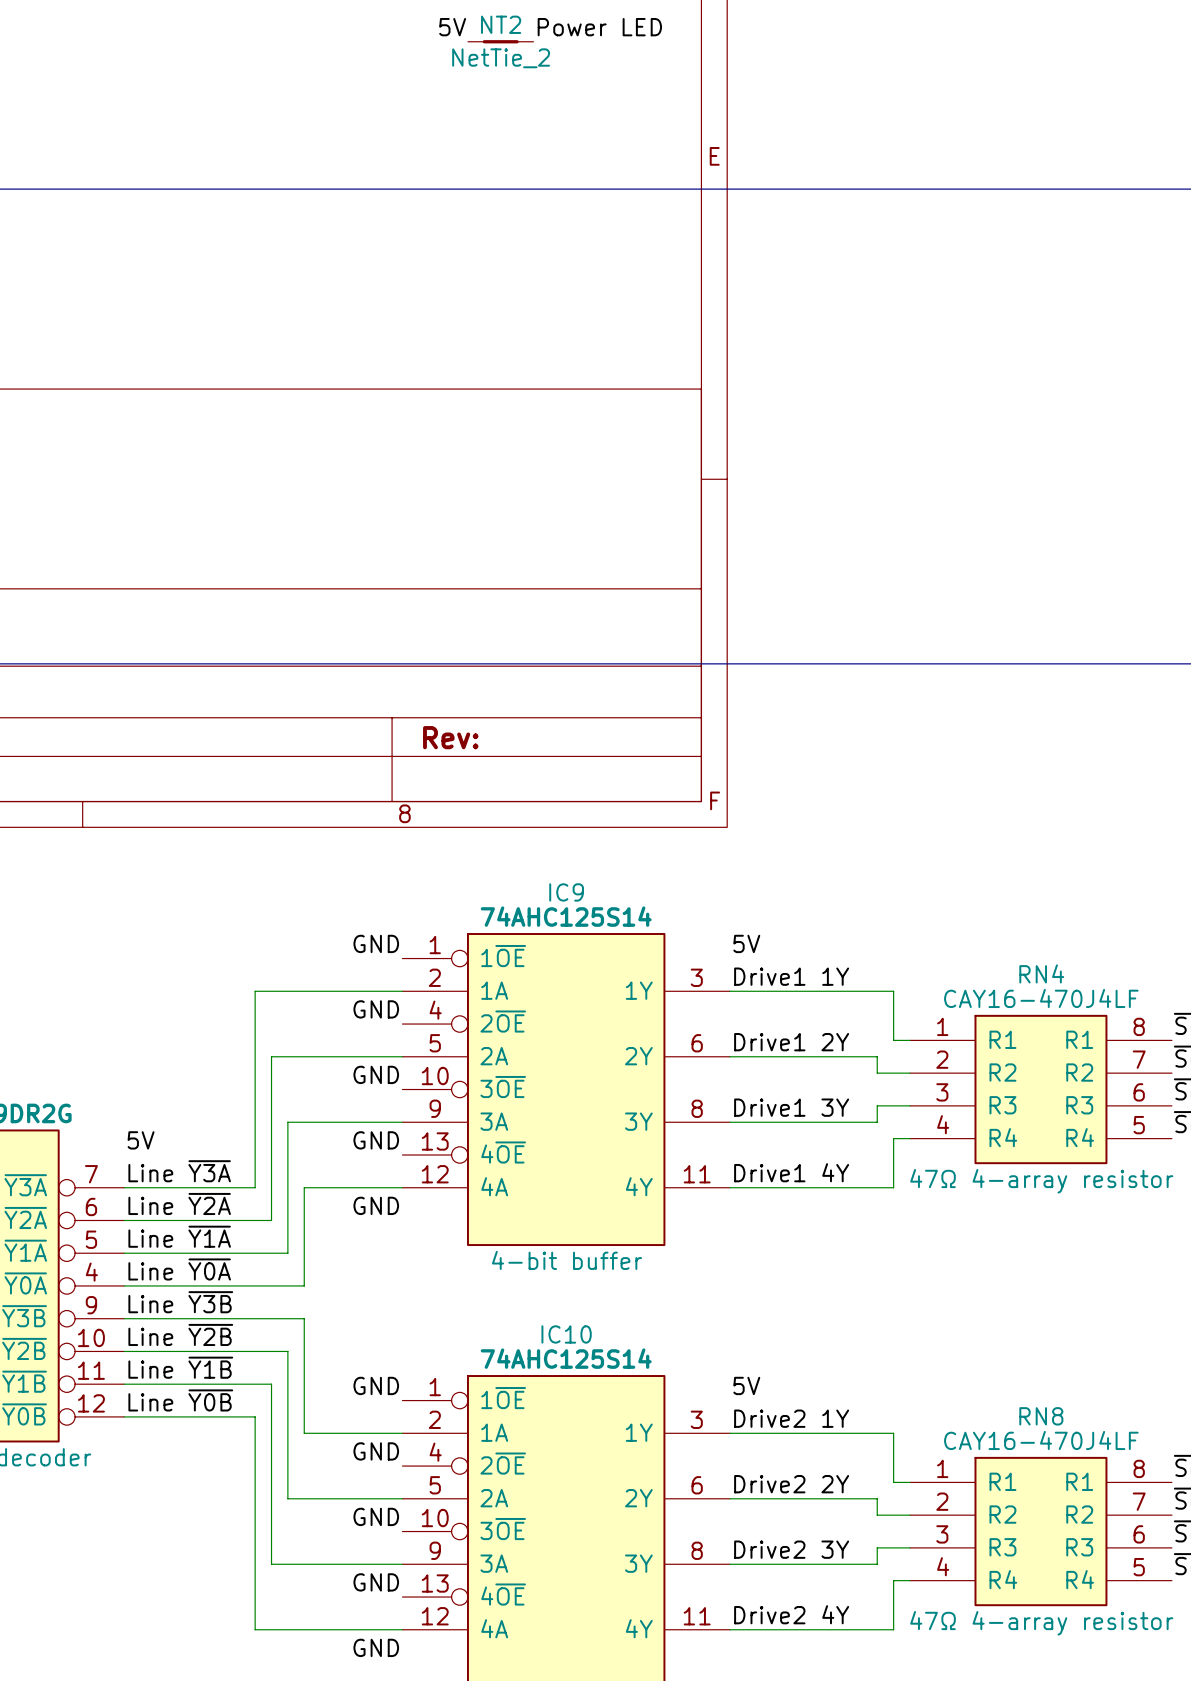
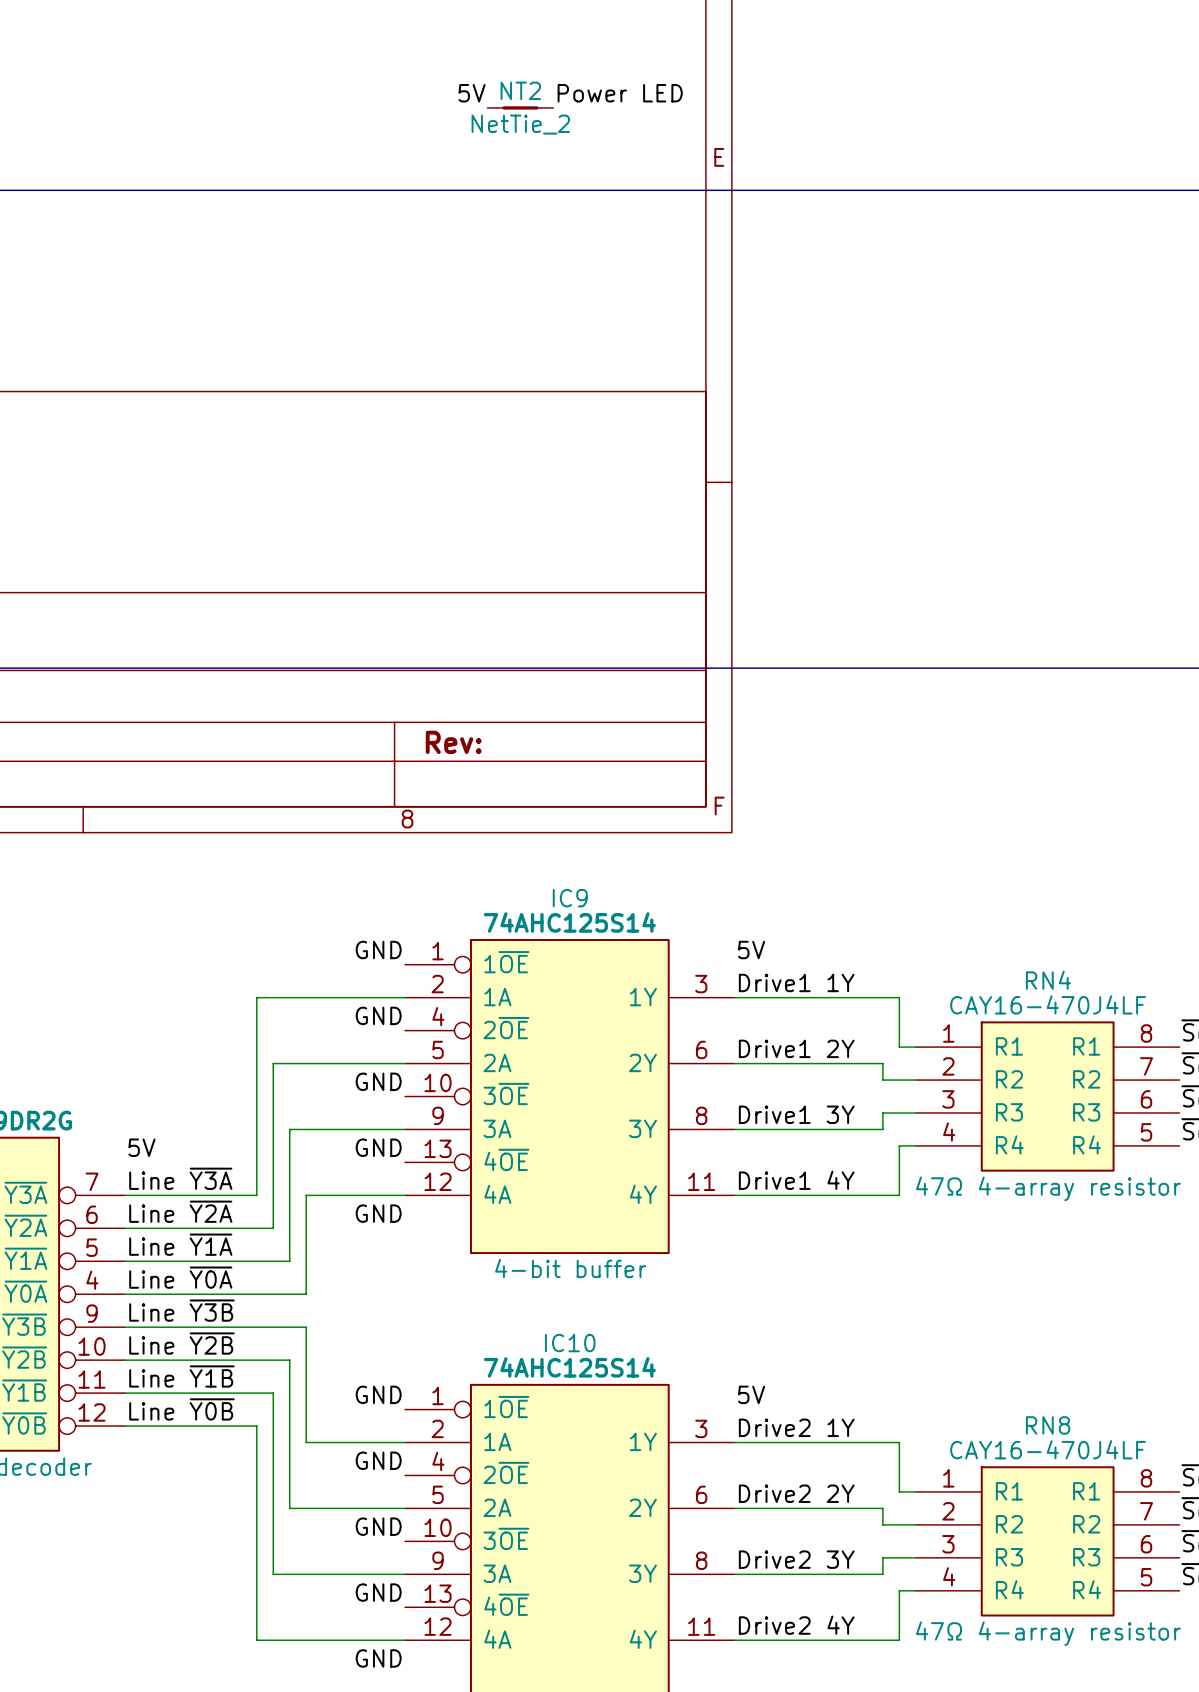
label position: 5V (452, 27) -> 5V (472, 93)
label position: Power LED (599, 27) -> Power LED (620, 93)
NT2 position: (500, 41) -> (520, 107)

